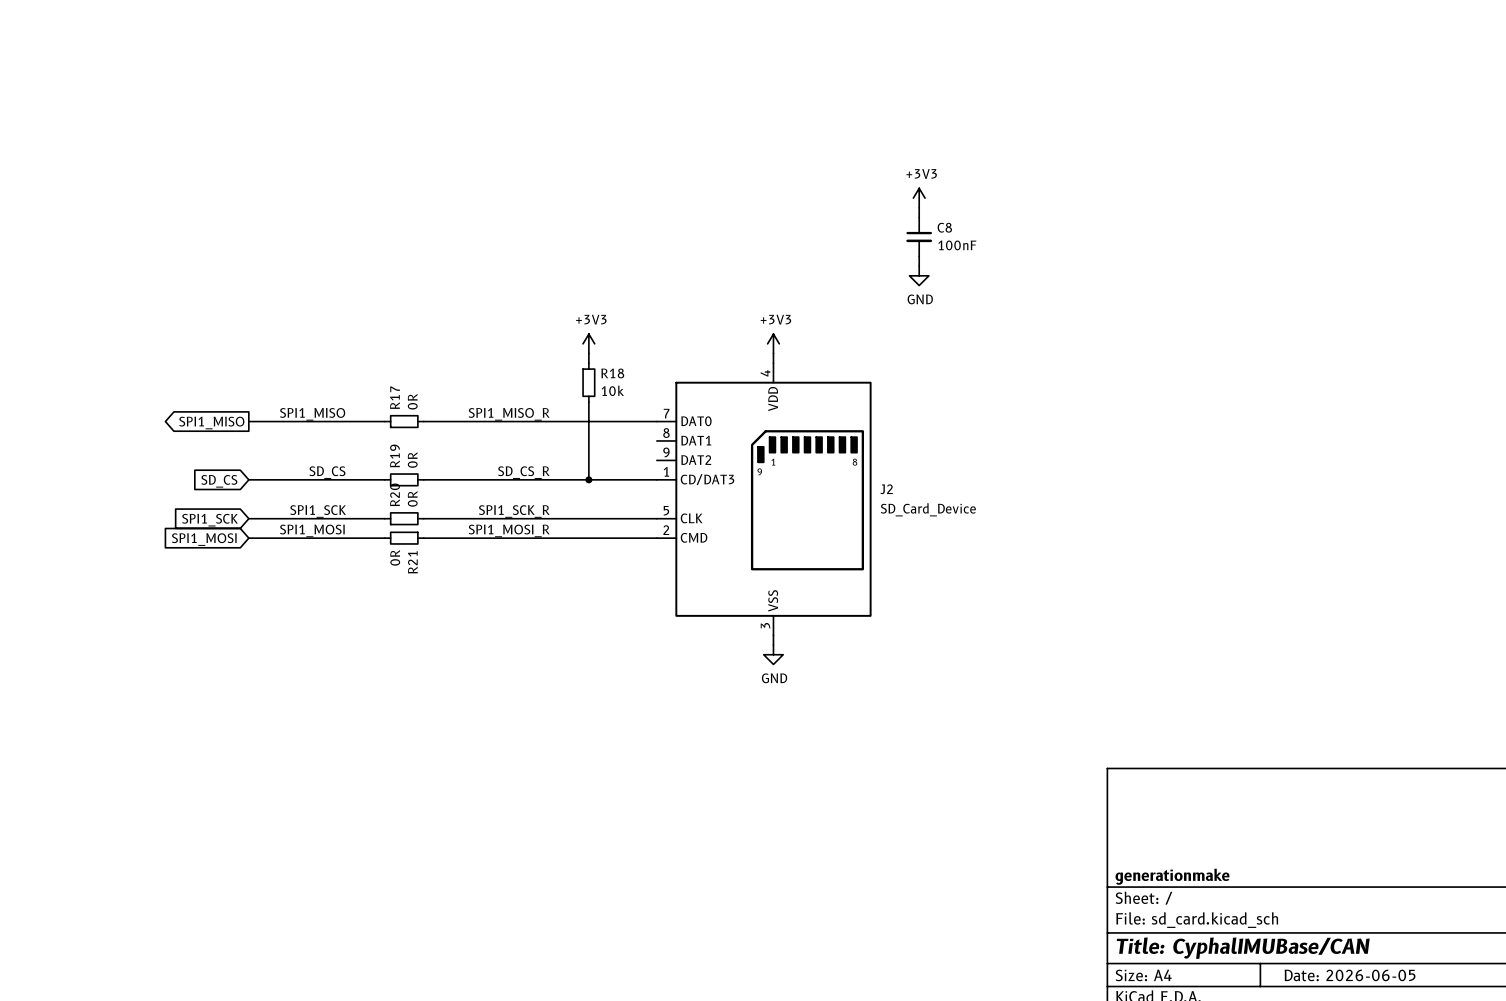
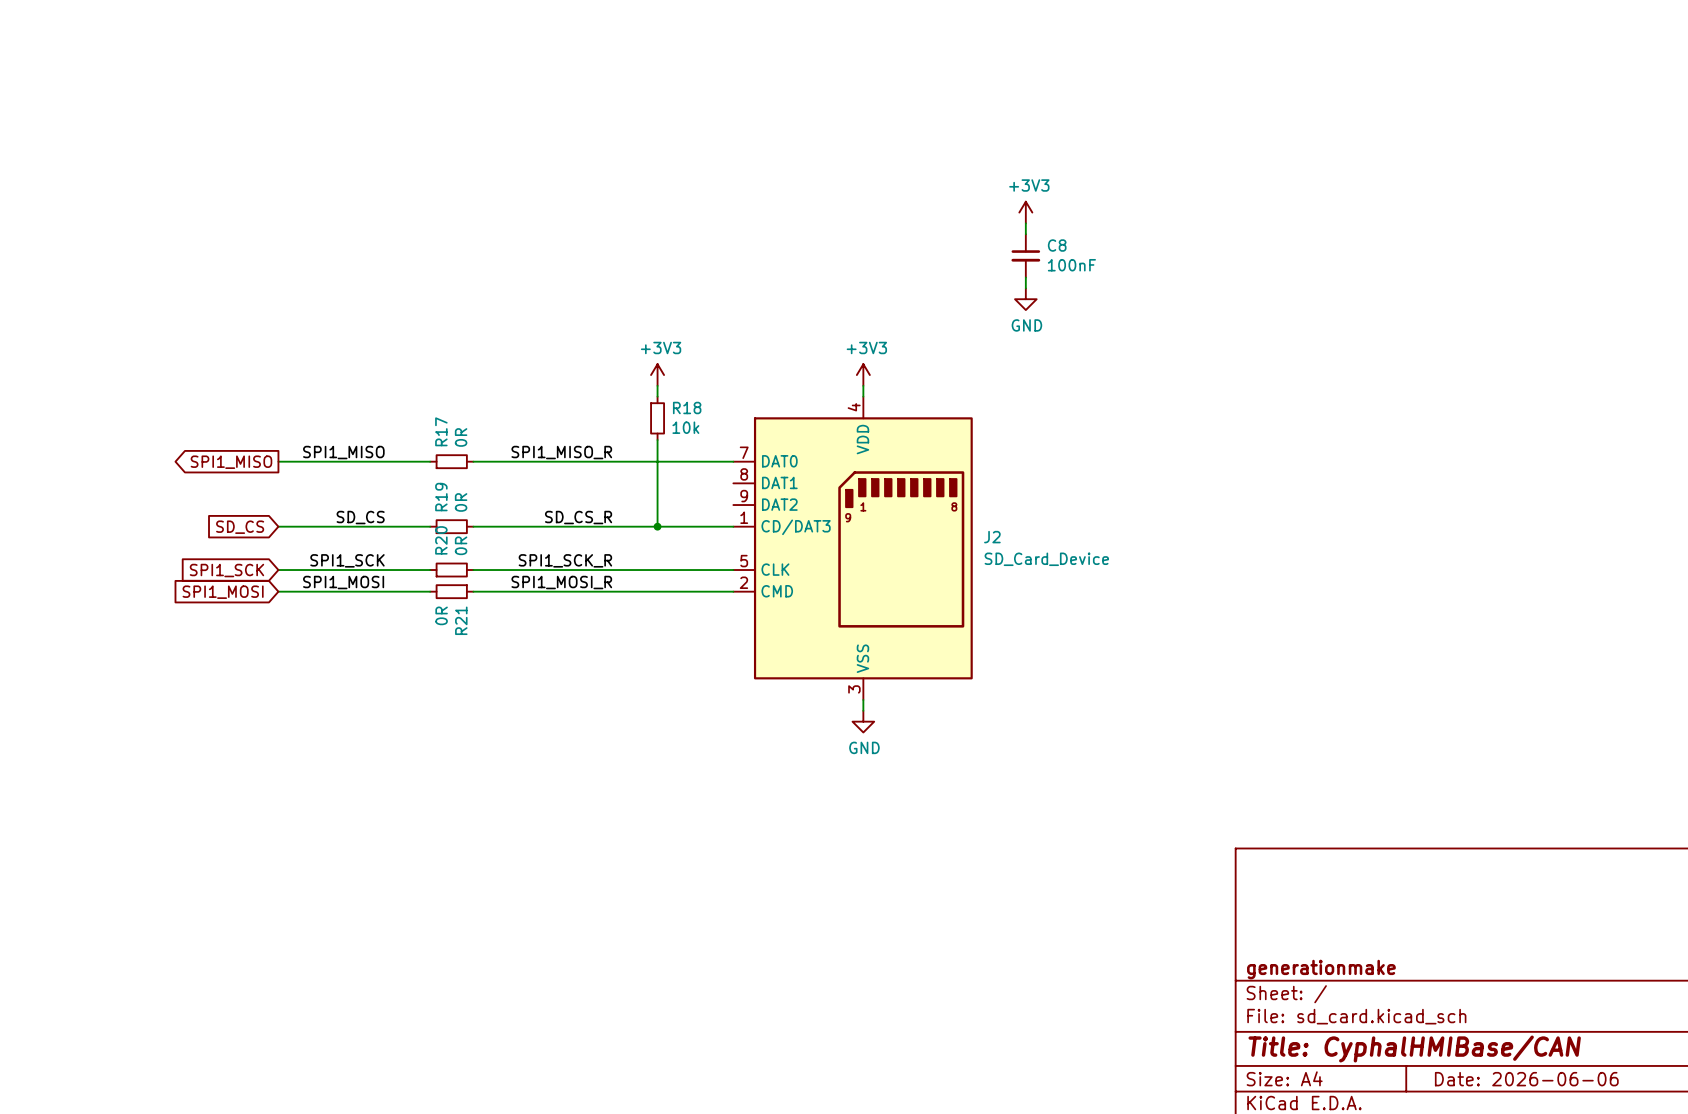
title block: Title: CyphalIMUBase/CAN (1243, 948) -> Title: CyphalHMIBase/CAN (1414, 1049)
title block: Date: 2026-06-05 (1350, 975) -> Date: 2026-06-06 (1526, 1079)

